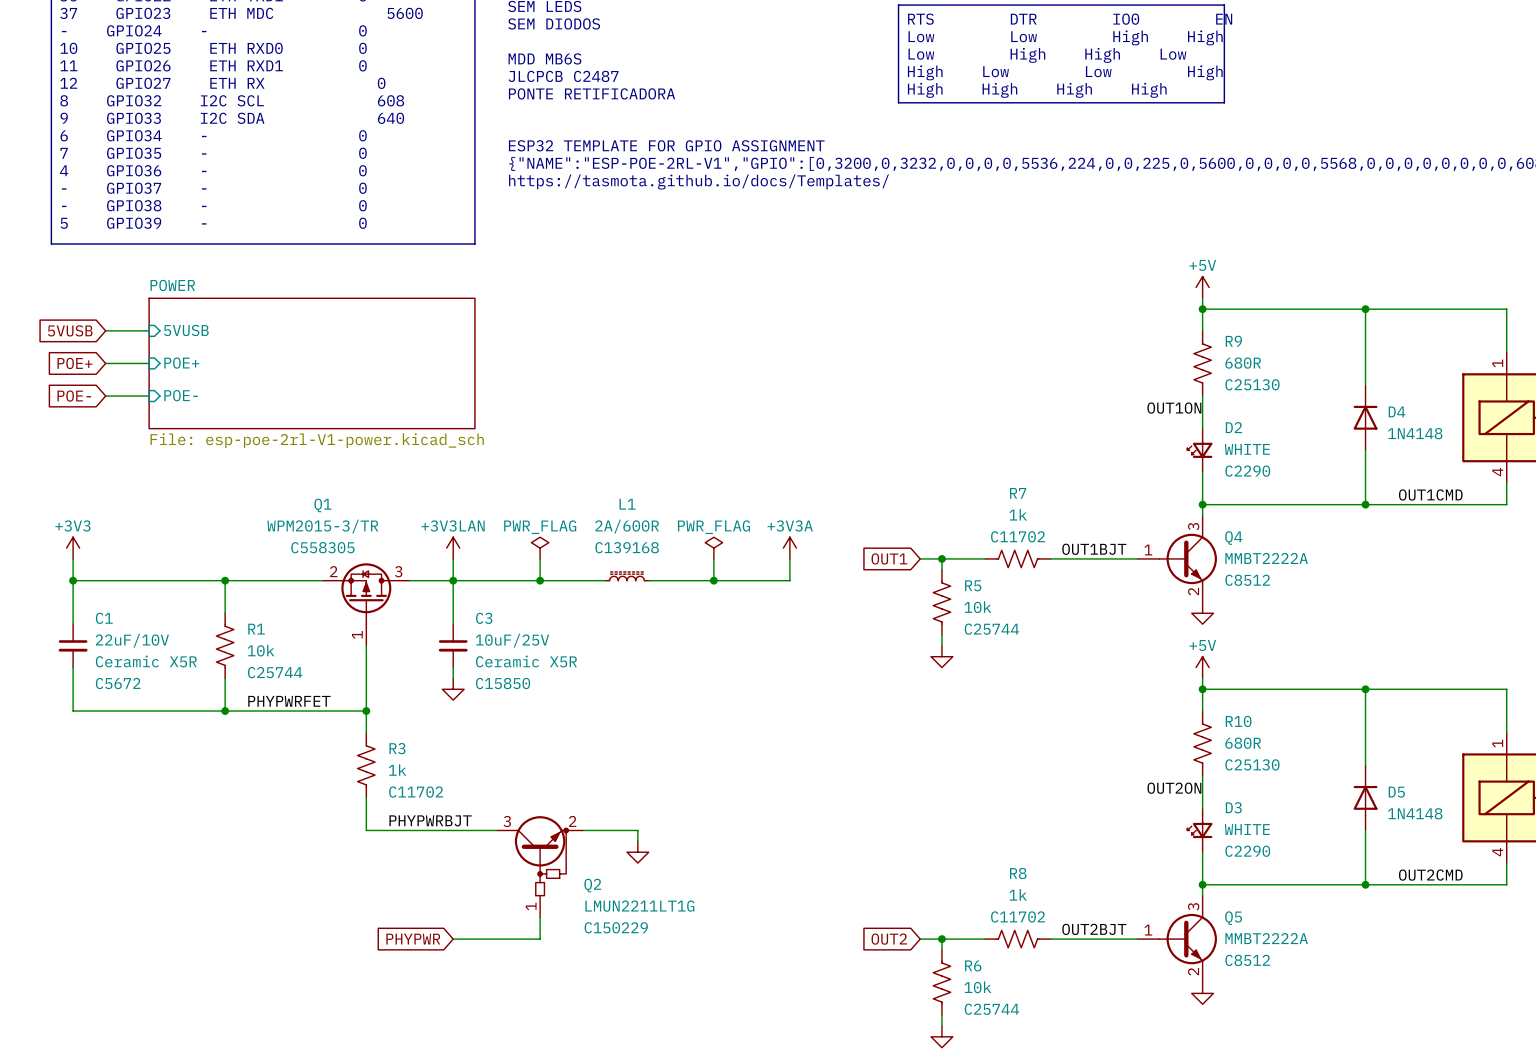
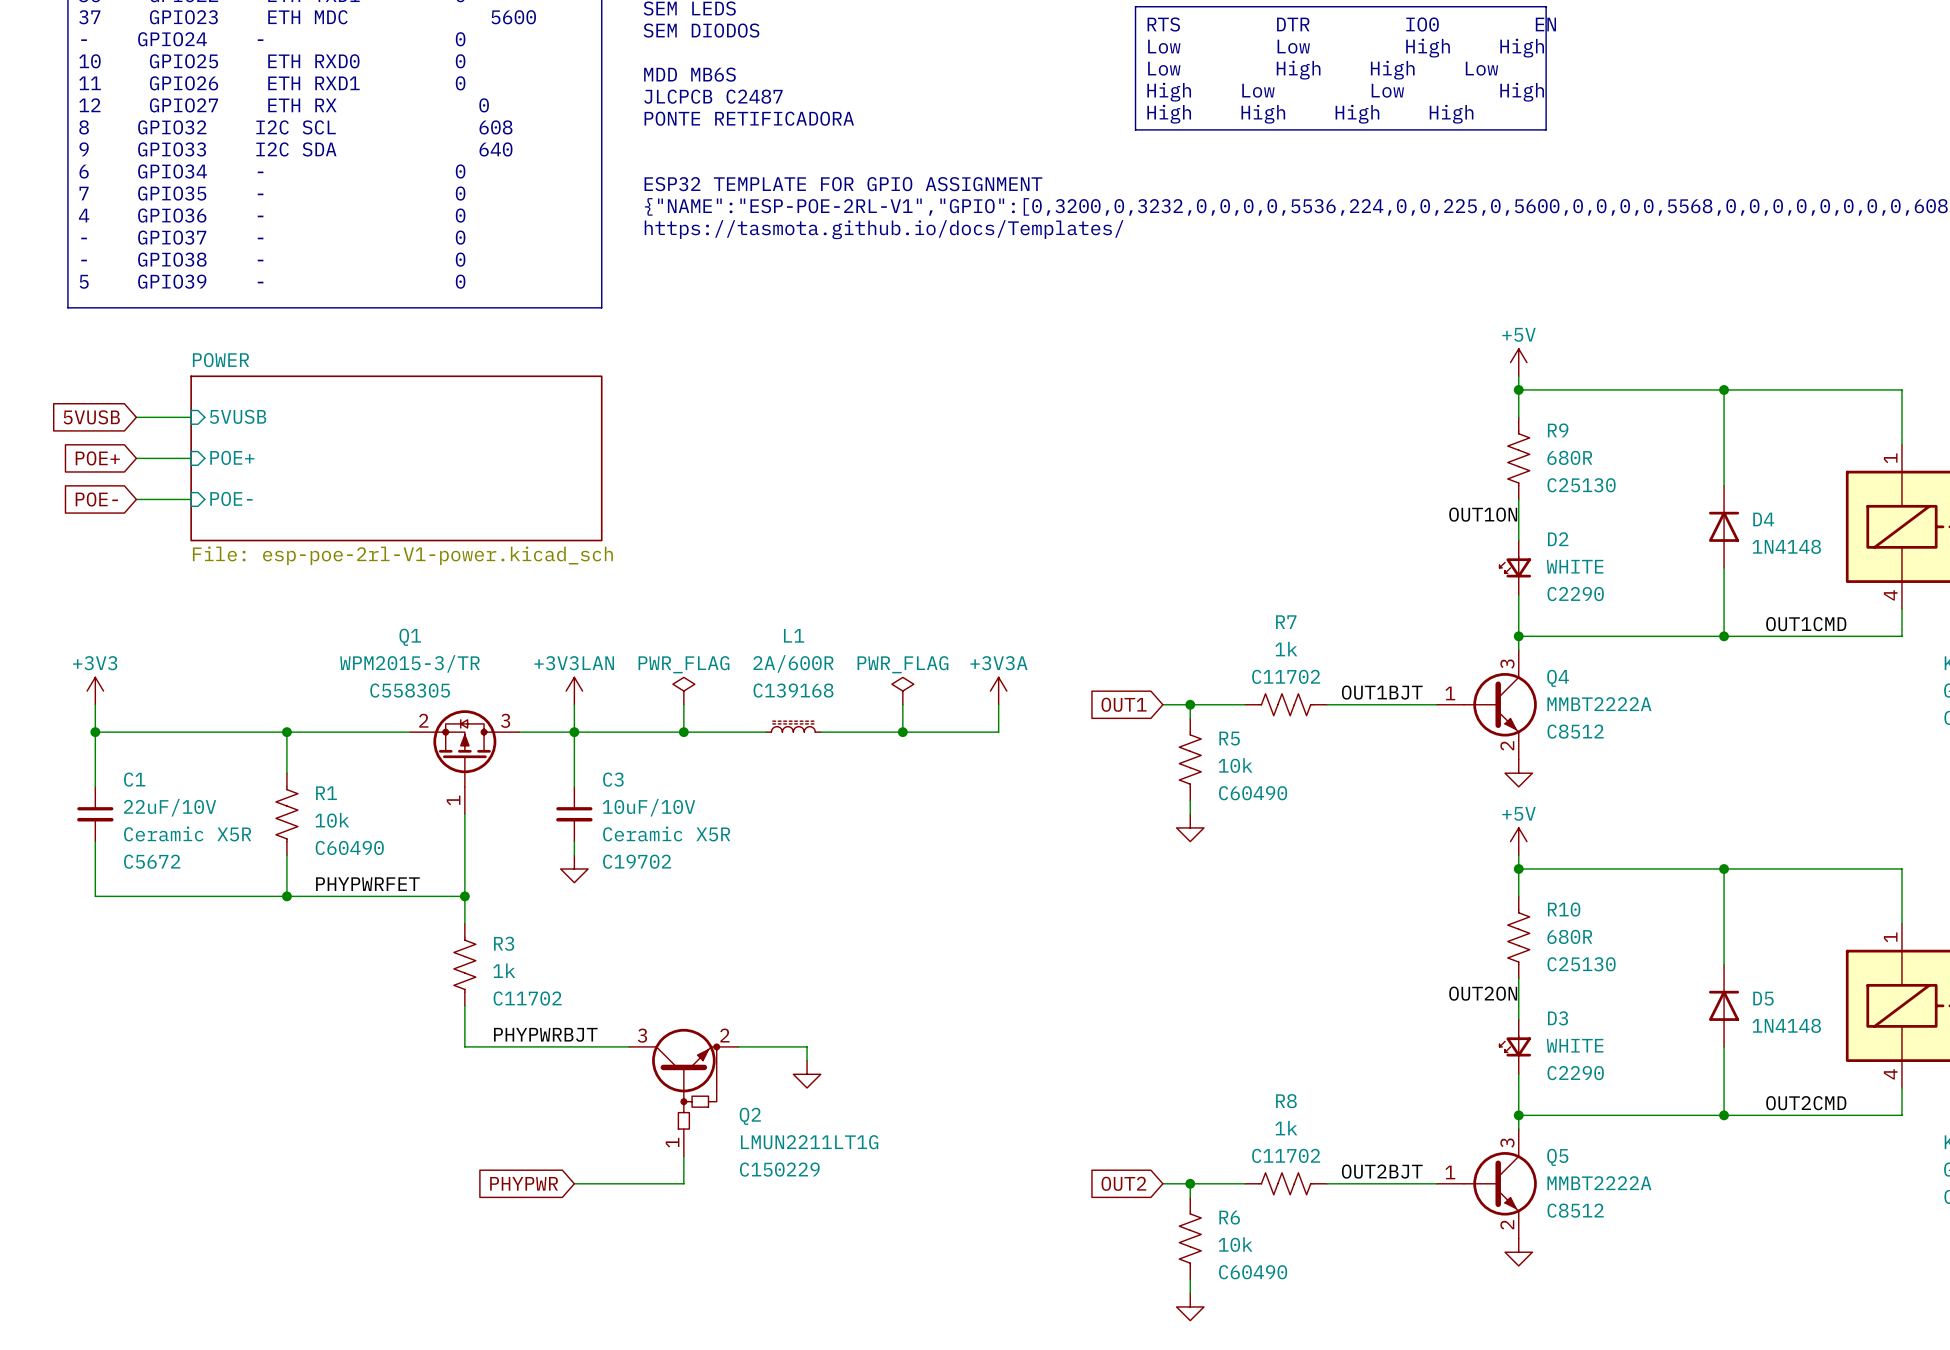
R5 text: C25744 (991, 629) -> C60490 (1253, 793)
C3 value: 10uF/25V (512, 640) -> 10uF/10V (648, 807)
R1 text: C25744 (275, 672) -> C60490 (349, 847)
C3 text: C15850 (503, 683) -> C19702 (637, 861)
R6 text: C25744 (991, 1009) -> C60490 (1253, 1272)

